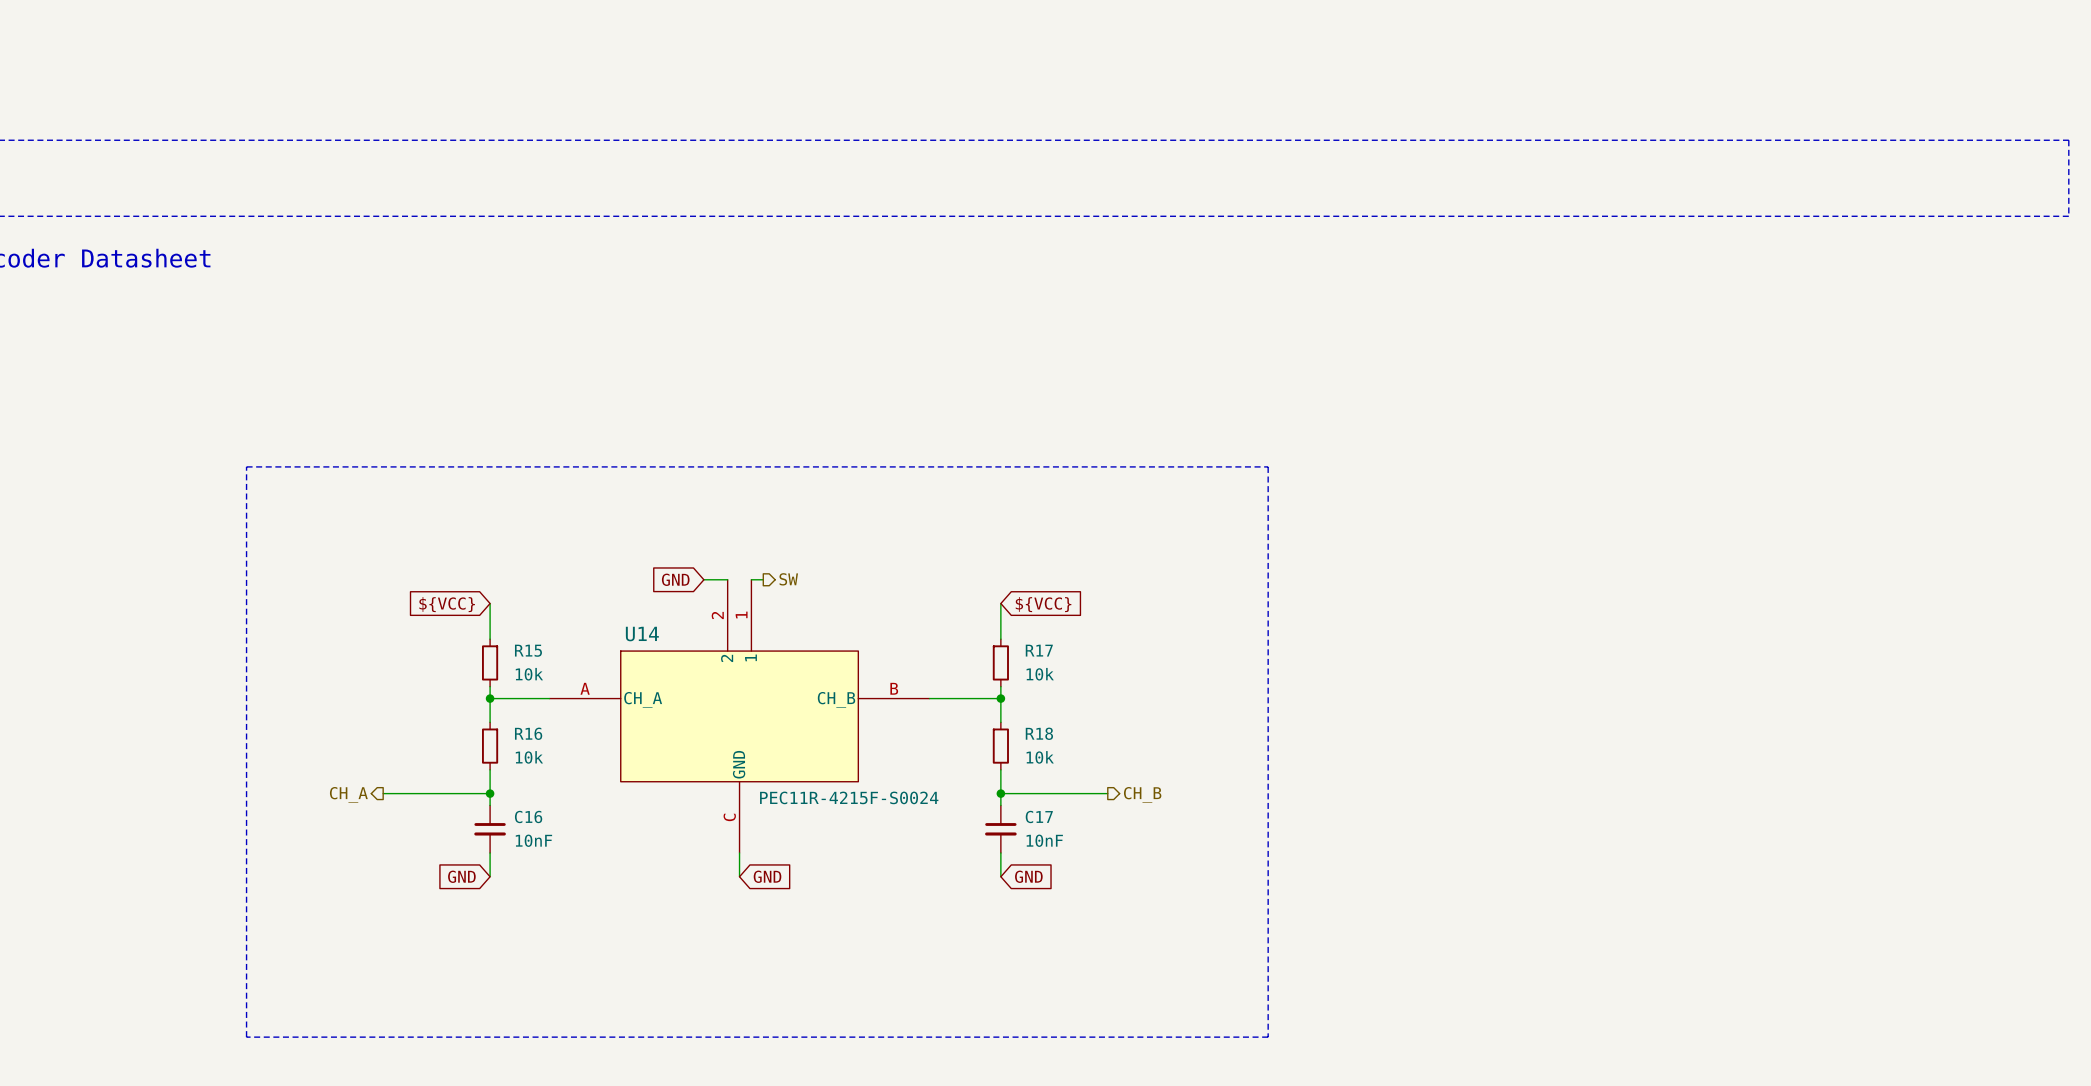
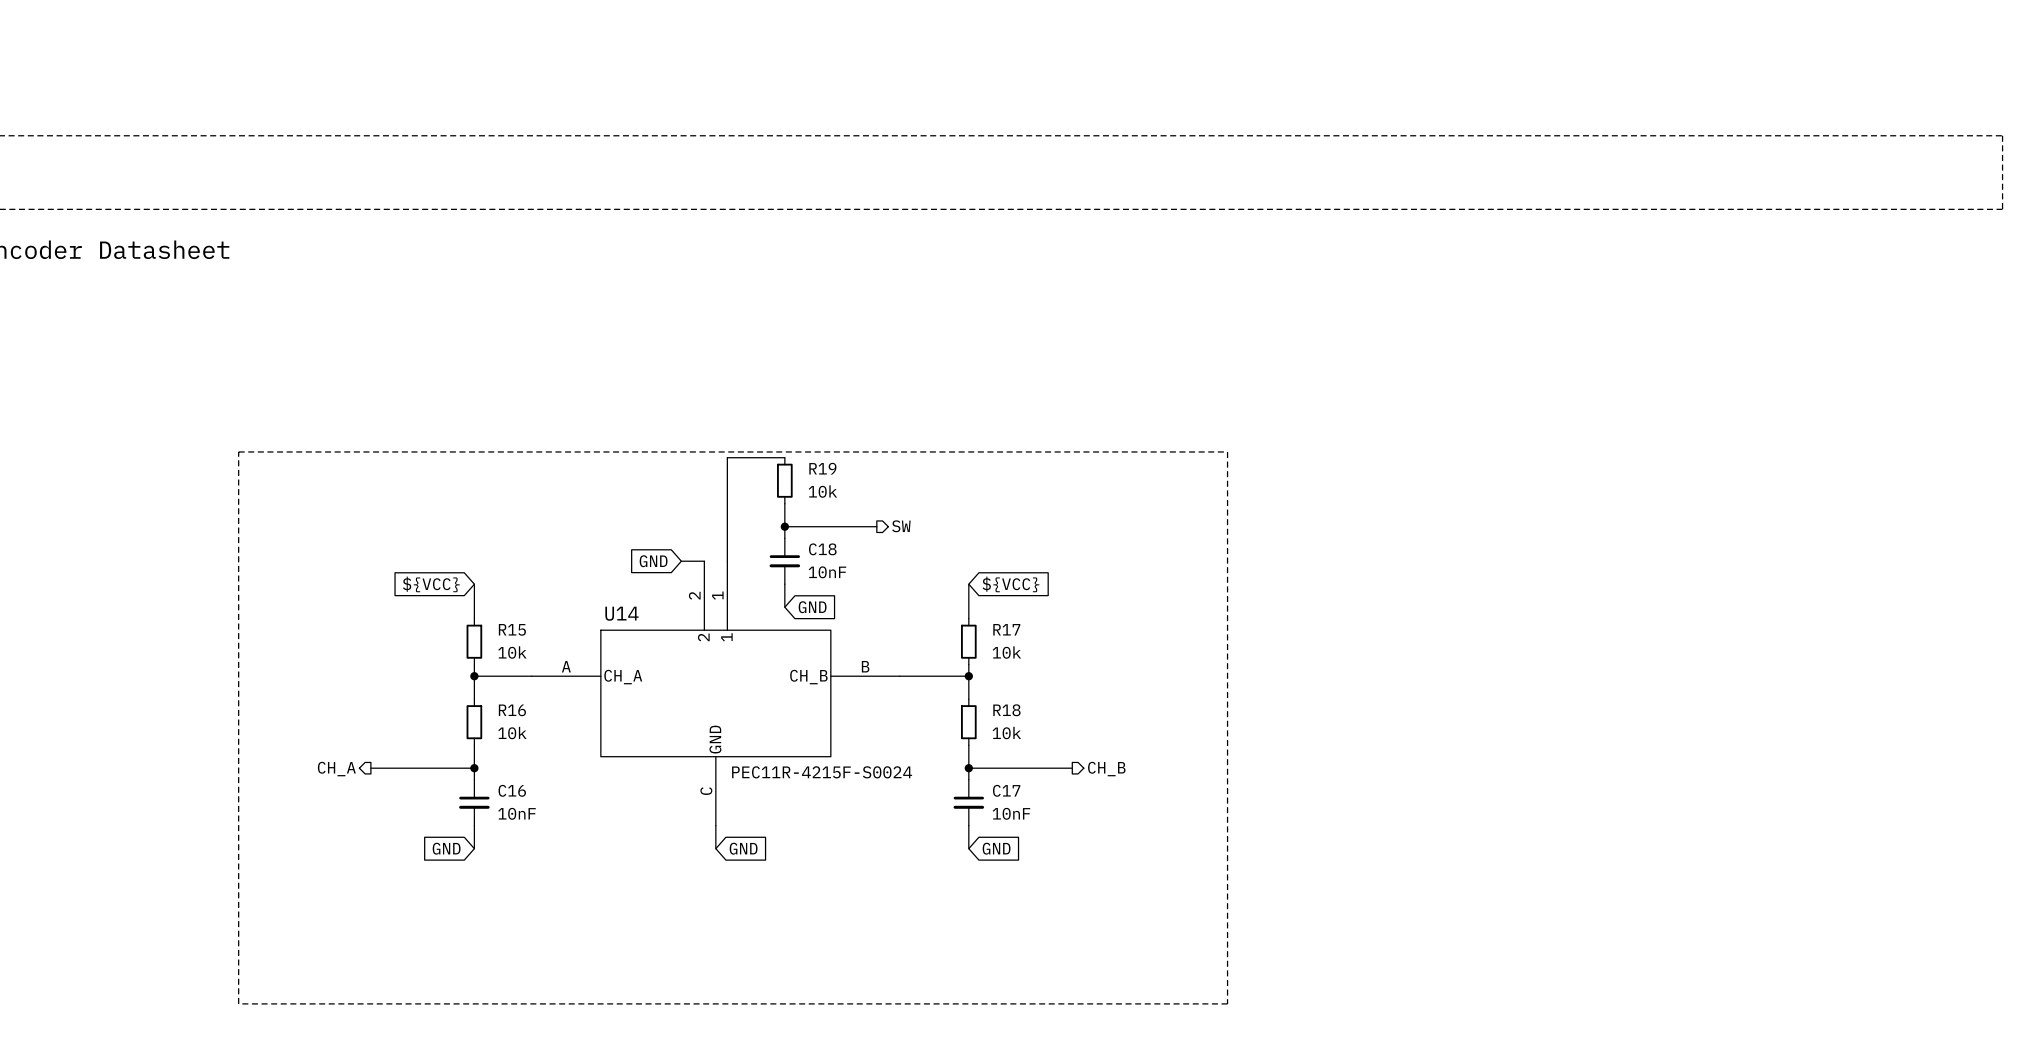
R19: none -> 10k (784, 480)
wire: none -> (784, 503) (784, 538)
wire: none -> (784, 526) (876, 526)
junction: none -> (784, 526)
wire: (751, 579) (763, 579) -> (727, 561) (727, 457) (784, 457)
hierarchical label position: SW (788, 579) -> SW (901, 526)
C18: none -> 10nF (784, 561)
wire: none -> (784, 584) (784, 607)
global label: none -> GND (812, 607)

